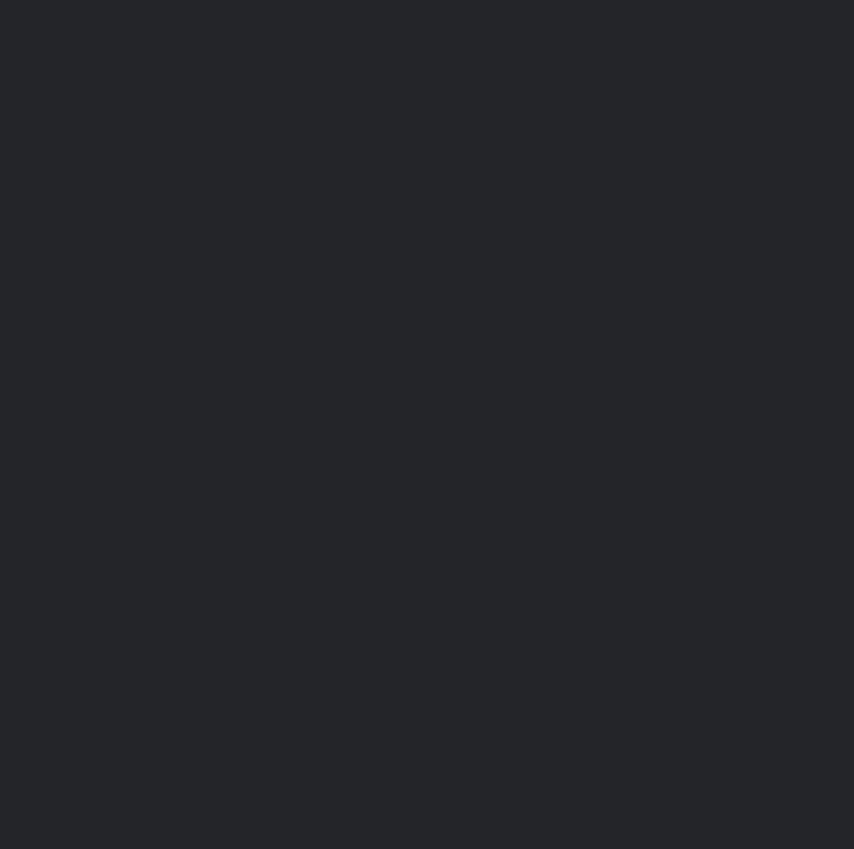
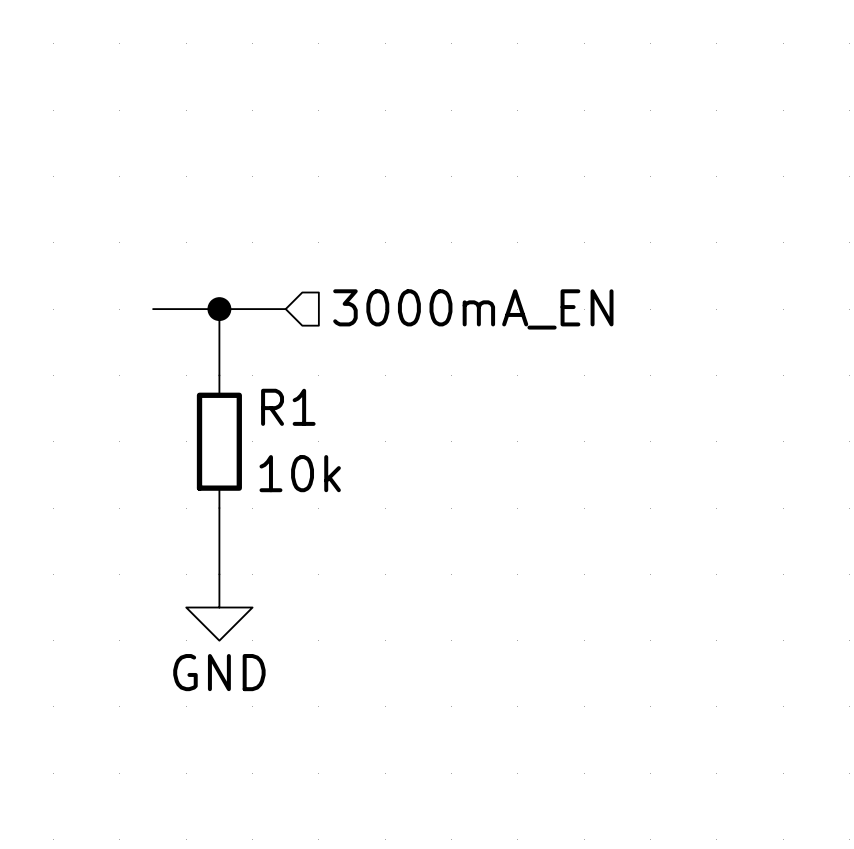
wire: none -> (153, 309) (285, 309)
wire: none -> (219, 309) (219, 375)
junction: none -> (219, 309)
hierarchical label: none -> 3000mA_EN (473, 309)
R1: none -> 10k (219, 441)
wire: none -> (219, 508) (219, 574)
power symbol: none -> GND (219, 607)

